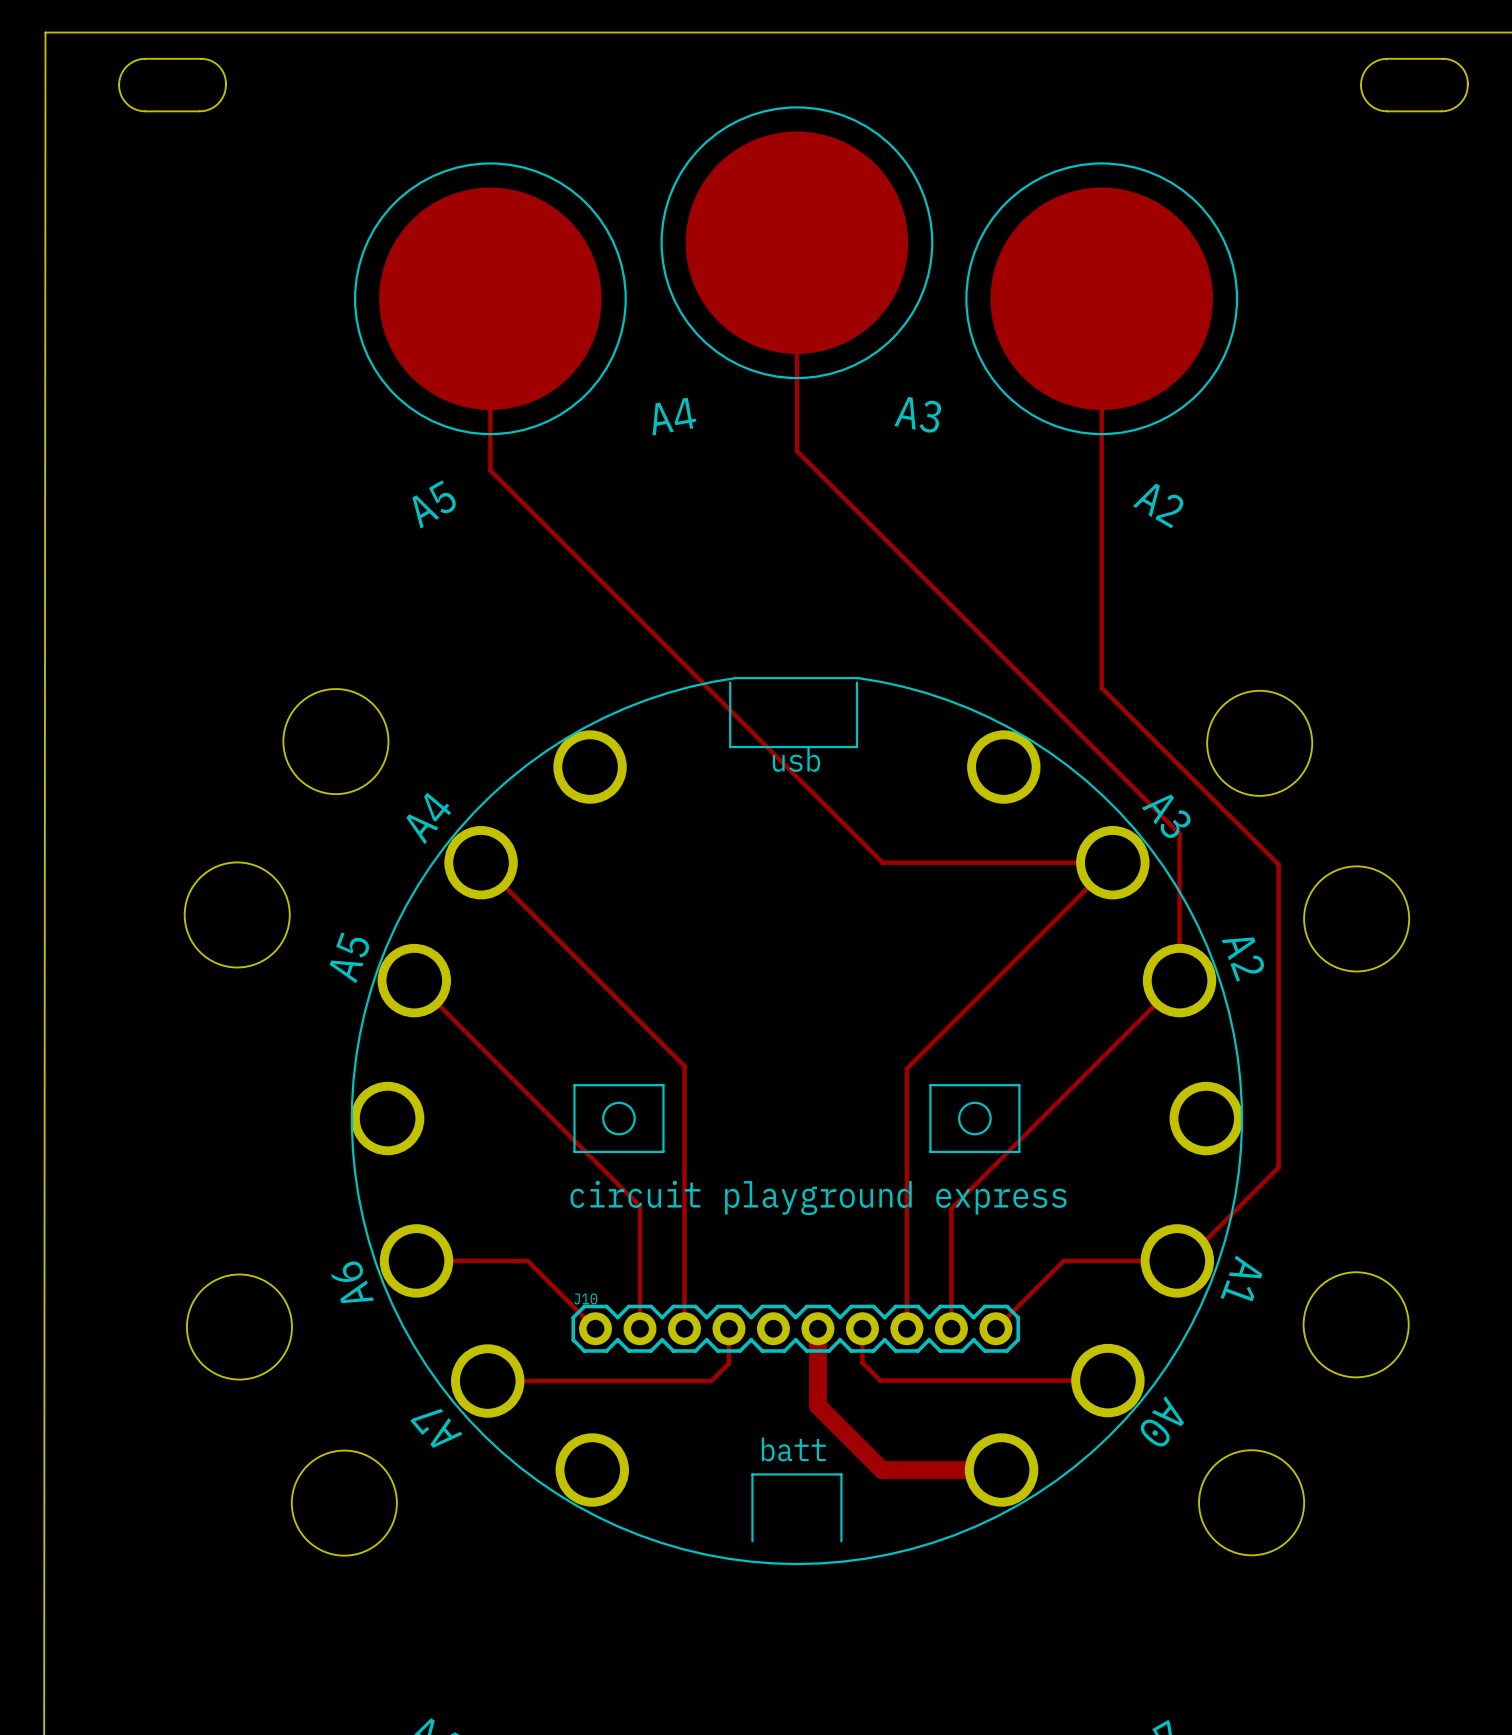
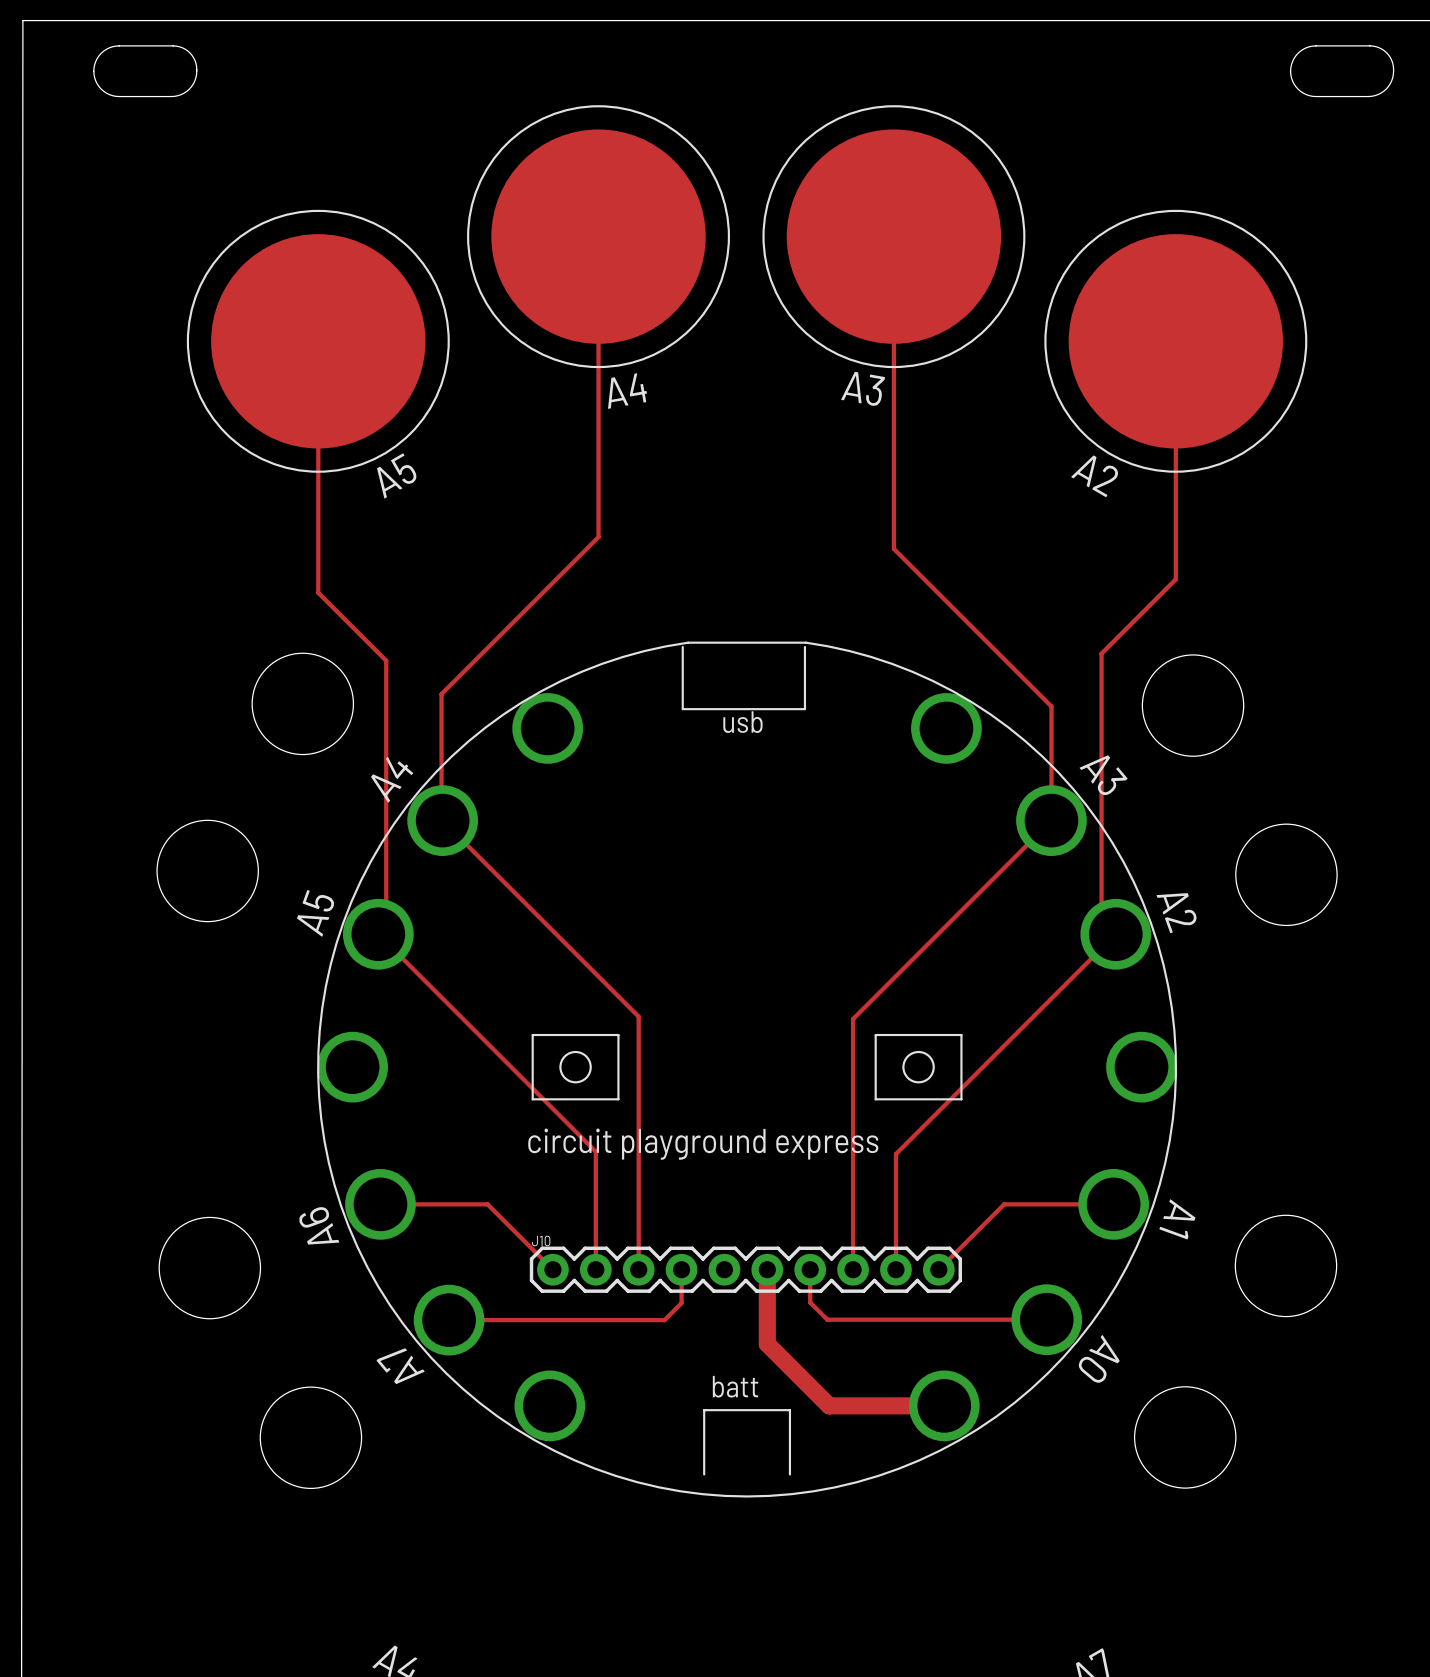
track: (796, 242) (796, 451) (1179, 833) (1179, 980) -> (1175, 341) (1175, 579) (1101, 653) (1101, 919) (1115, 934)
part: (796, 242) -> none
track: none -> (598, 236) (598, 537) (441, 694) (442, 820)
part: none -> (598, 236)
part: none -> (893, 236)
track: (490, 298) (490, 470) (882, 862) (1112, 862) -> (893, 236) (893, 548) (1051, 706) (1051, 820)
part: (490, 298) -> none
track: (1101, 298) (1101, 687) (1278, 864) (1278, 1167) (1185, 1260) (1177, 1260) -> none
part: (1101, 298) -> none
track: none -> (318, 341) (318, 592) (386, 660) (387, 918) (378, 927) (378, 934)
part: none -> (318, 341)
part: none -> (1175, 341)

